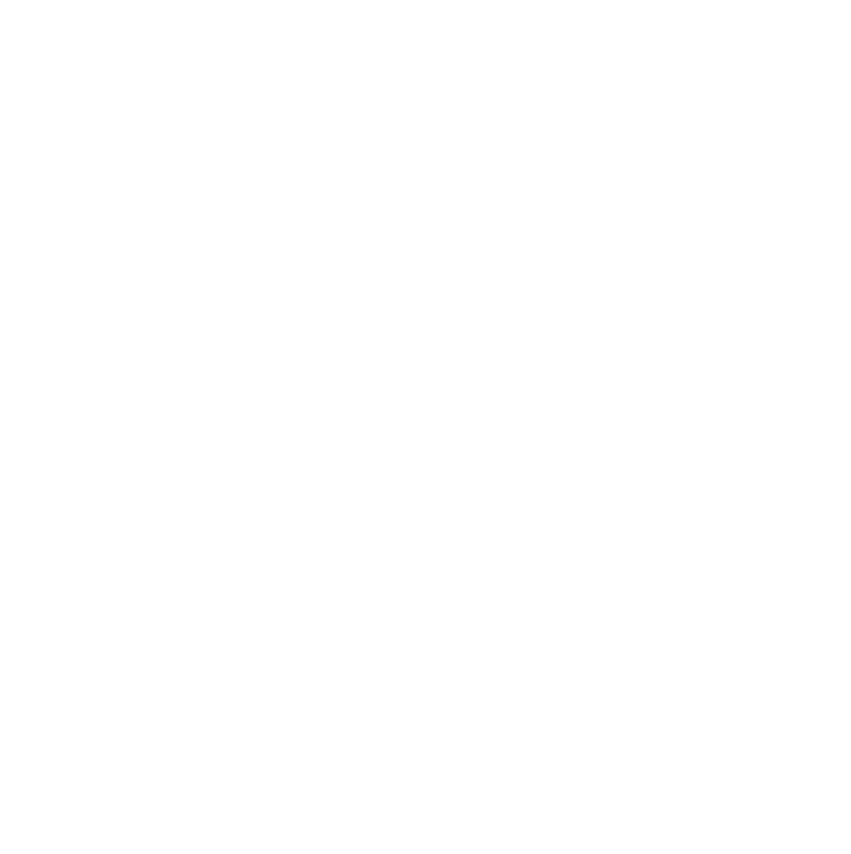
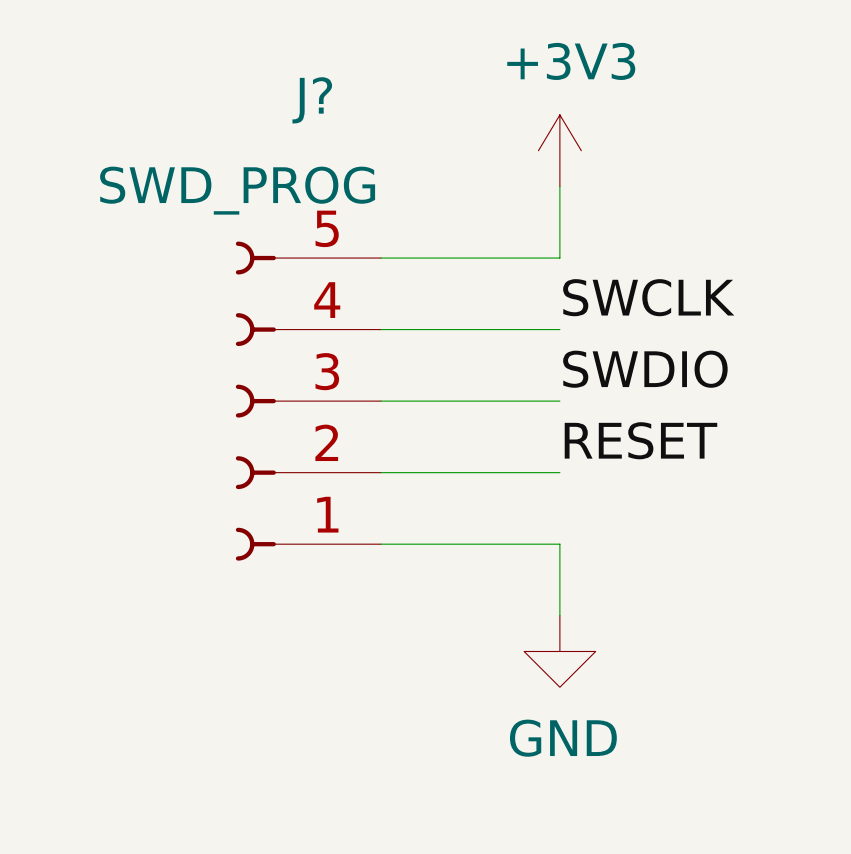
power symbol: none -> +3V3 (559, 150)
wire: none -> (559, 186) (559, 258) (381, 258)
label: none -> SWCLK (648, 297)
wire: none -> (381, 329) (559, 329)
label: none -> SWDIO (645, 369)
J?: none -> SWD_PROG (308, 401)
wire: none -> (381, 401) (559, 401)
label: none -> RESET (640, 440)
wire: none -> (381, 472) (559, 472)
wire: none -> (381, 544) (559, 544) (559, 615)
power symbol: none -> GND (559, 651)

